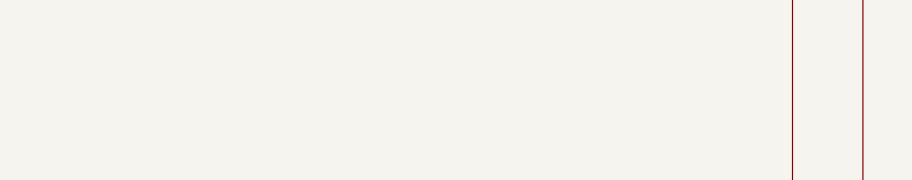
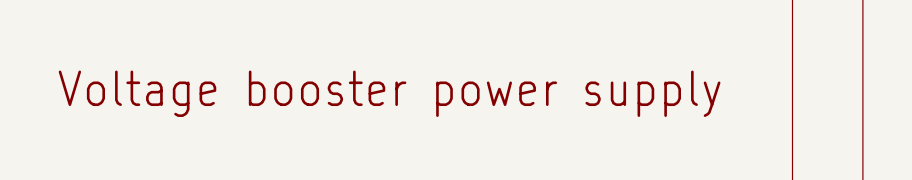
text: none -> Voltage booster power supply (389, 93)

